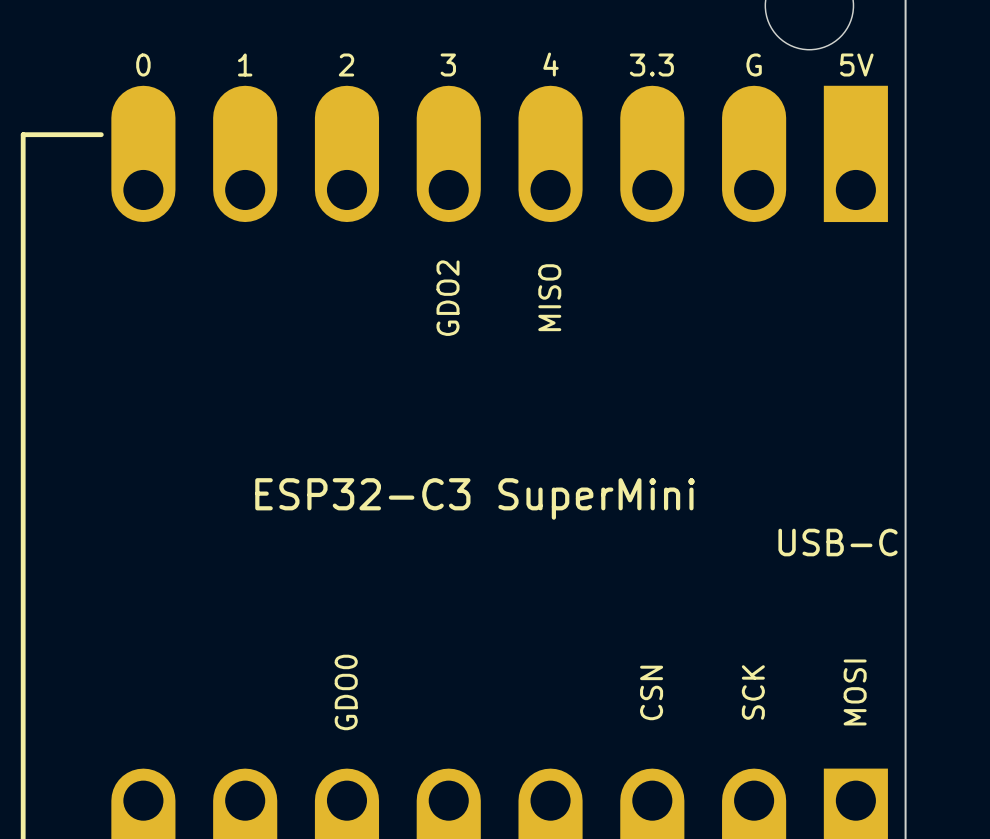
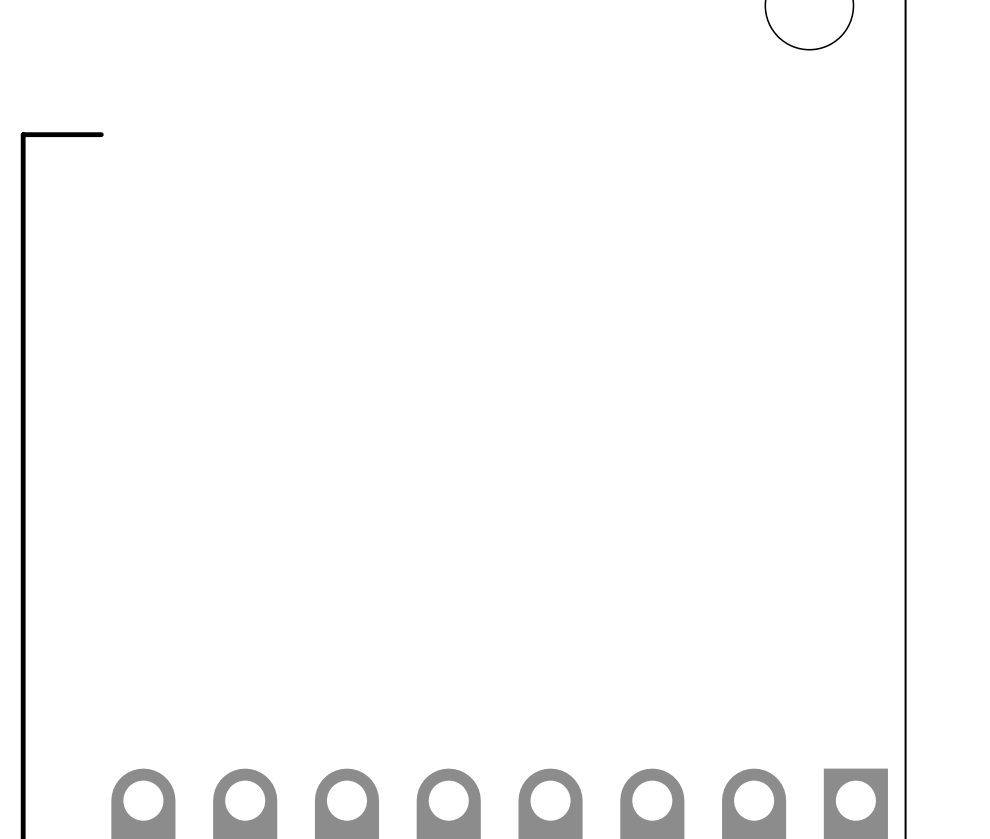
text: 4 (551, 64) -> none
text: 0 (143, 65) -> none
text: 1 (245, 65) -> none
text: 2 (346, 65) -> none
text: 3 (448, 65) -> none
text: 3.3 (651, 65) -> none
text: G (754, 65) -> none
text: 5V (856, 65) -> none
part: (499, 153) -> none
text: MISO (549, 297) -> none
text: GDO2 (448, 298) -> none
text: ESP32-C3 SuperMini (475, 498) -> none
text: USB-C (838, 542) -> none
text: GDO0 (346, 692) -> none
text: CSN (651, 692) -> none
text: SCK (753, 692) -> none
text: MOSI (855, 692) -> none

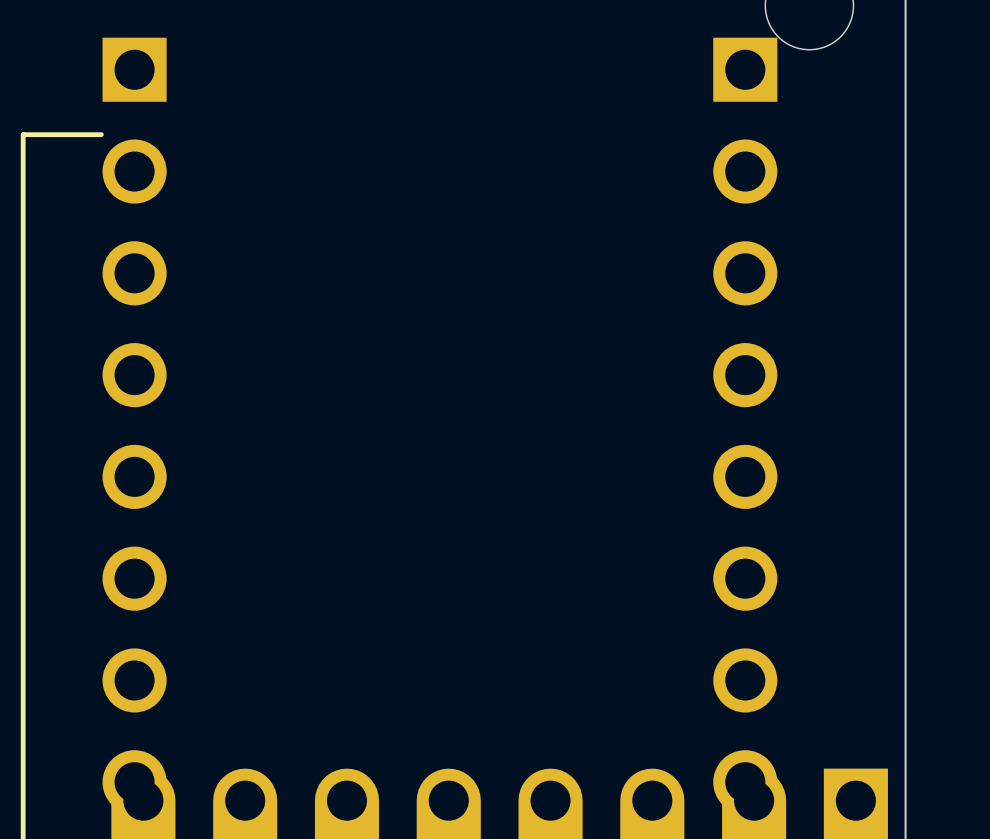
part: none -> (134, 426)
part: none -> (745, 426)

